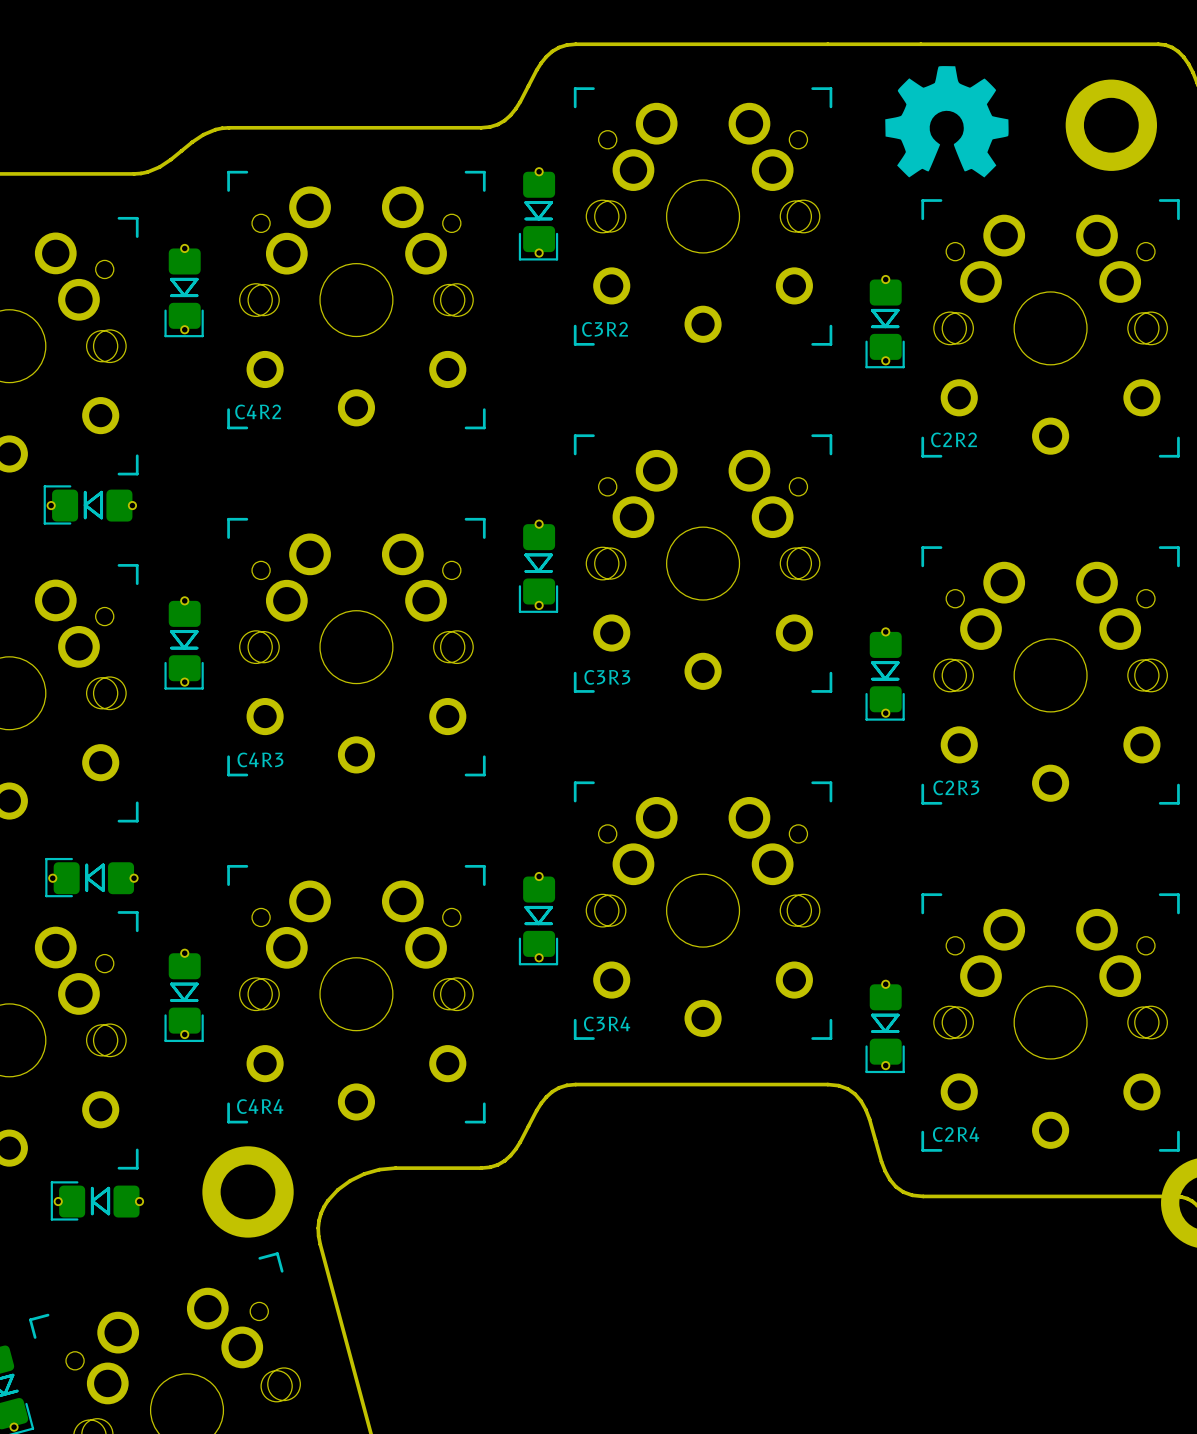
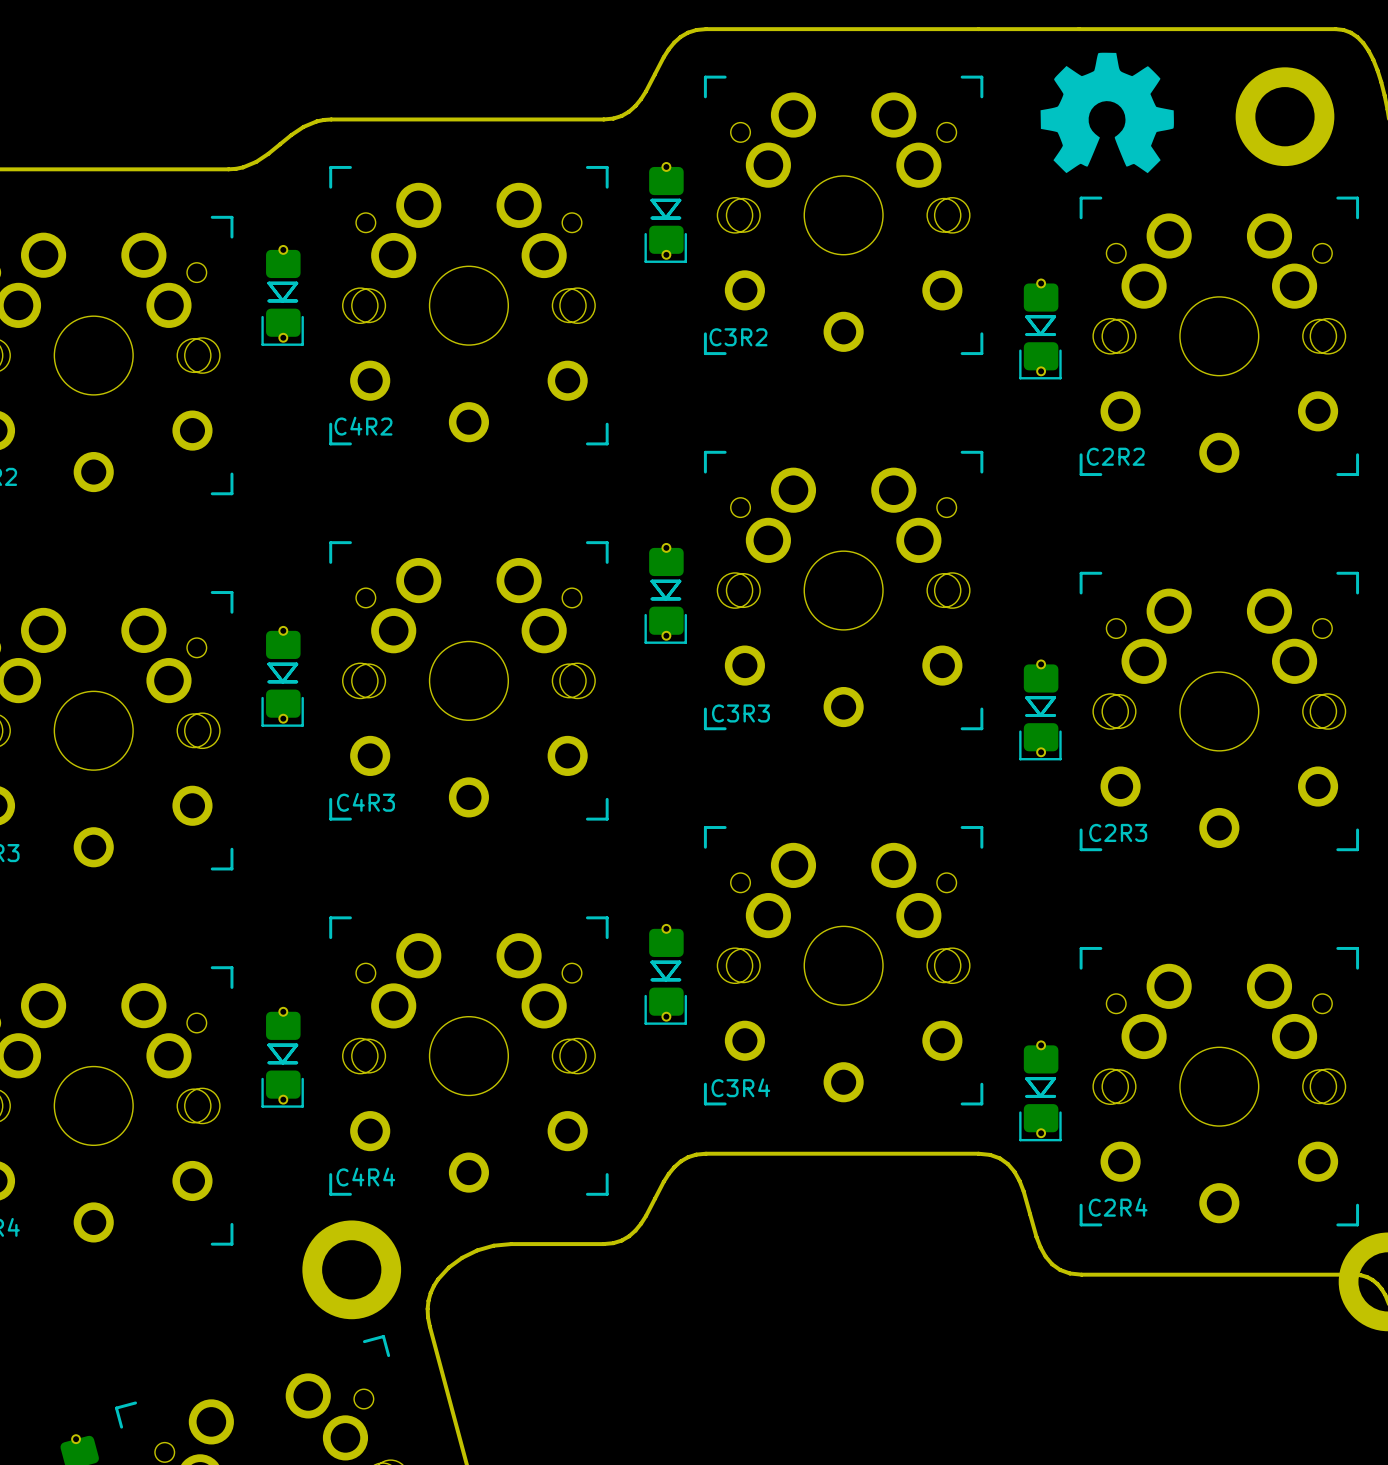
part: (90, 504) -> none
part: (91, 877) -> none
part: (97, 1200) -> none

